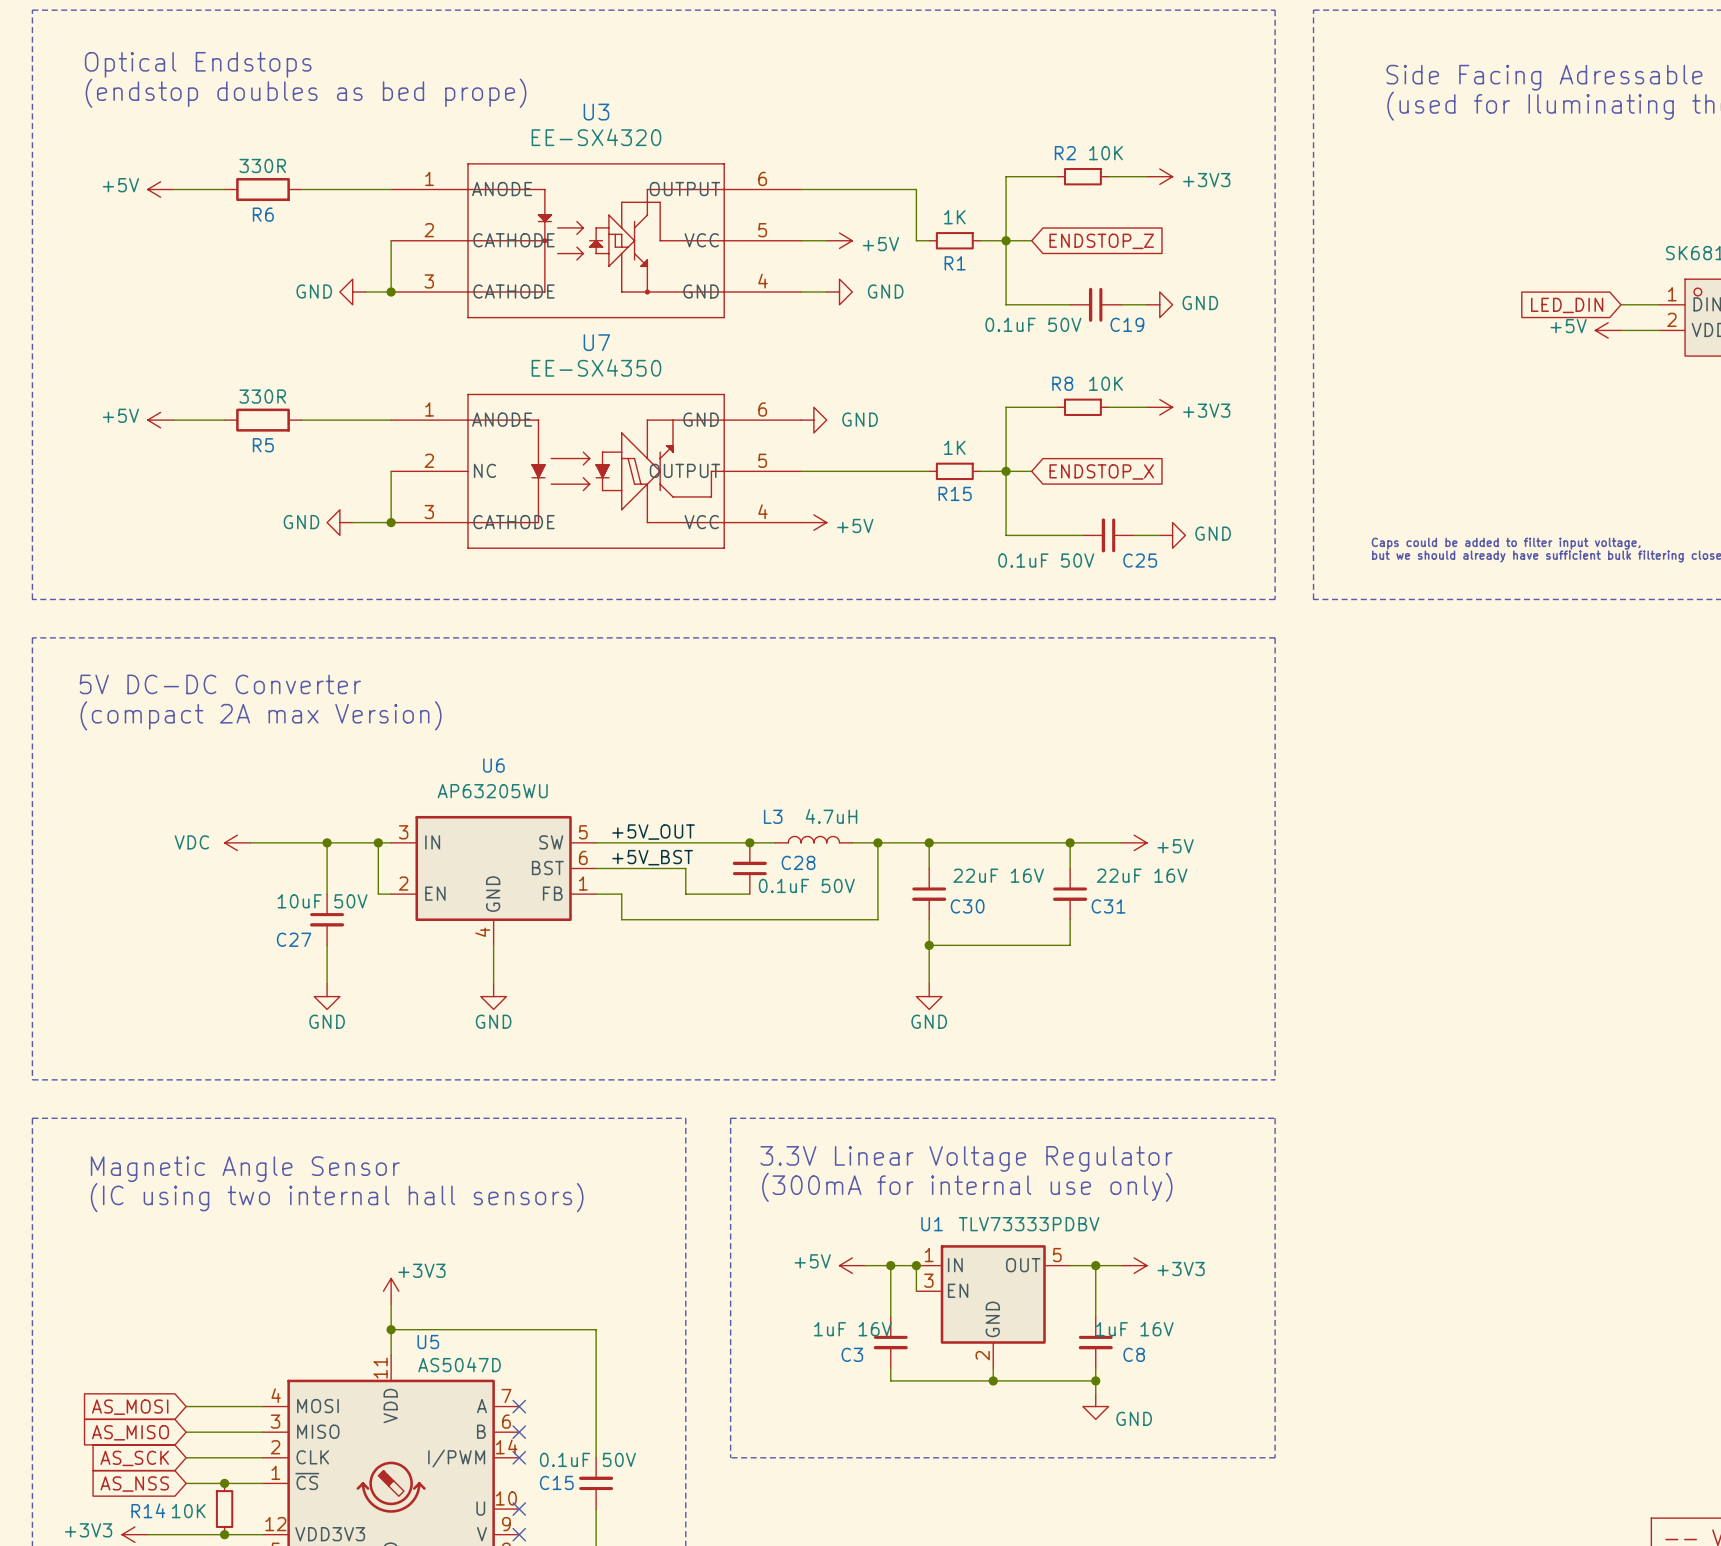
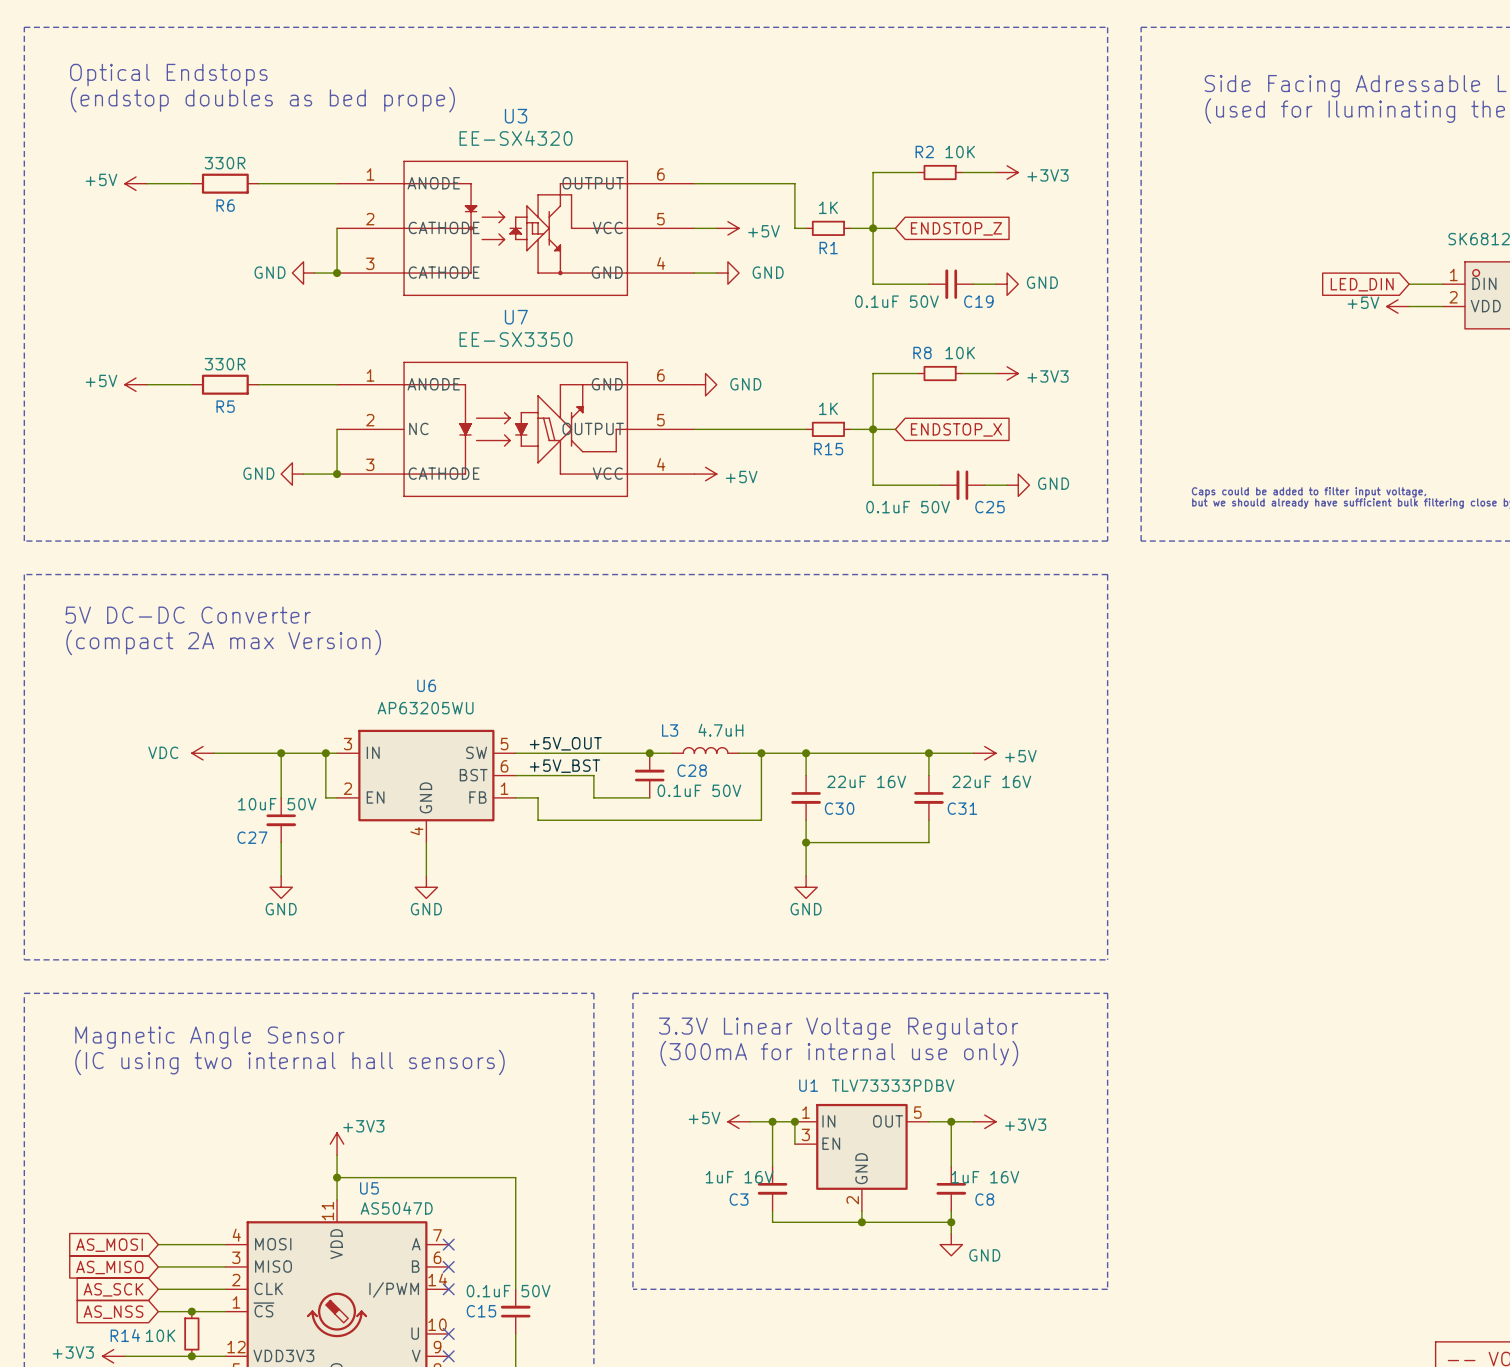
U7 value: EE-SX4350 (596, 367) -> EE-SX3350 (516, 339)

